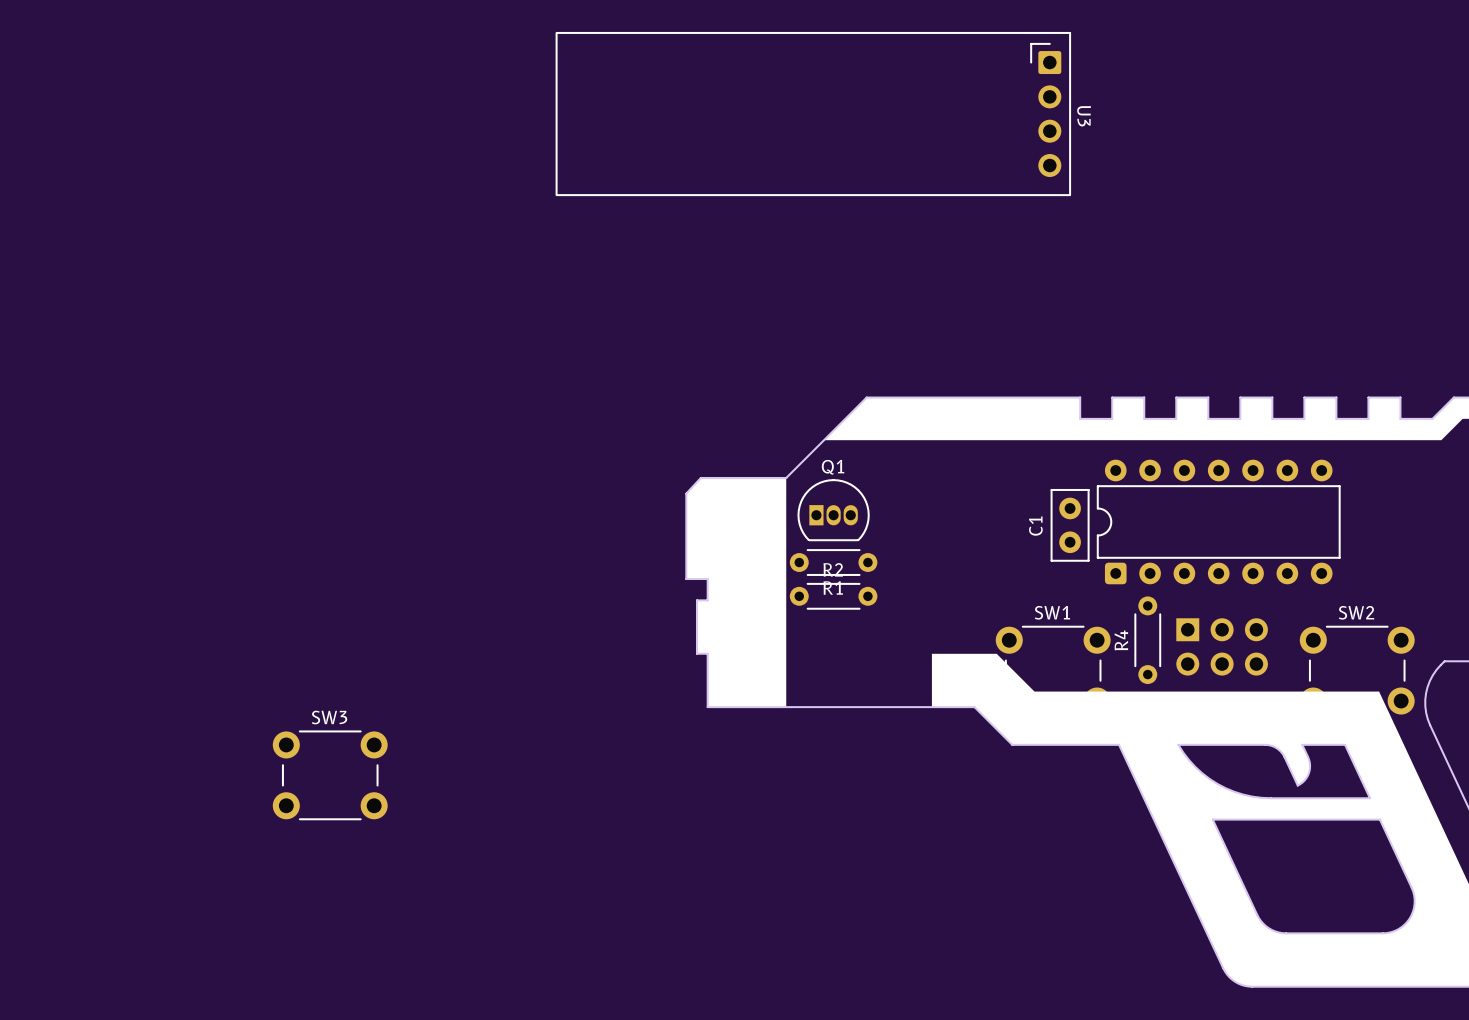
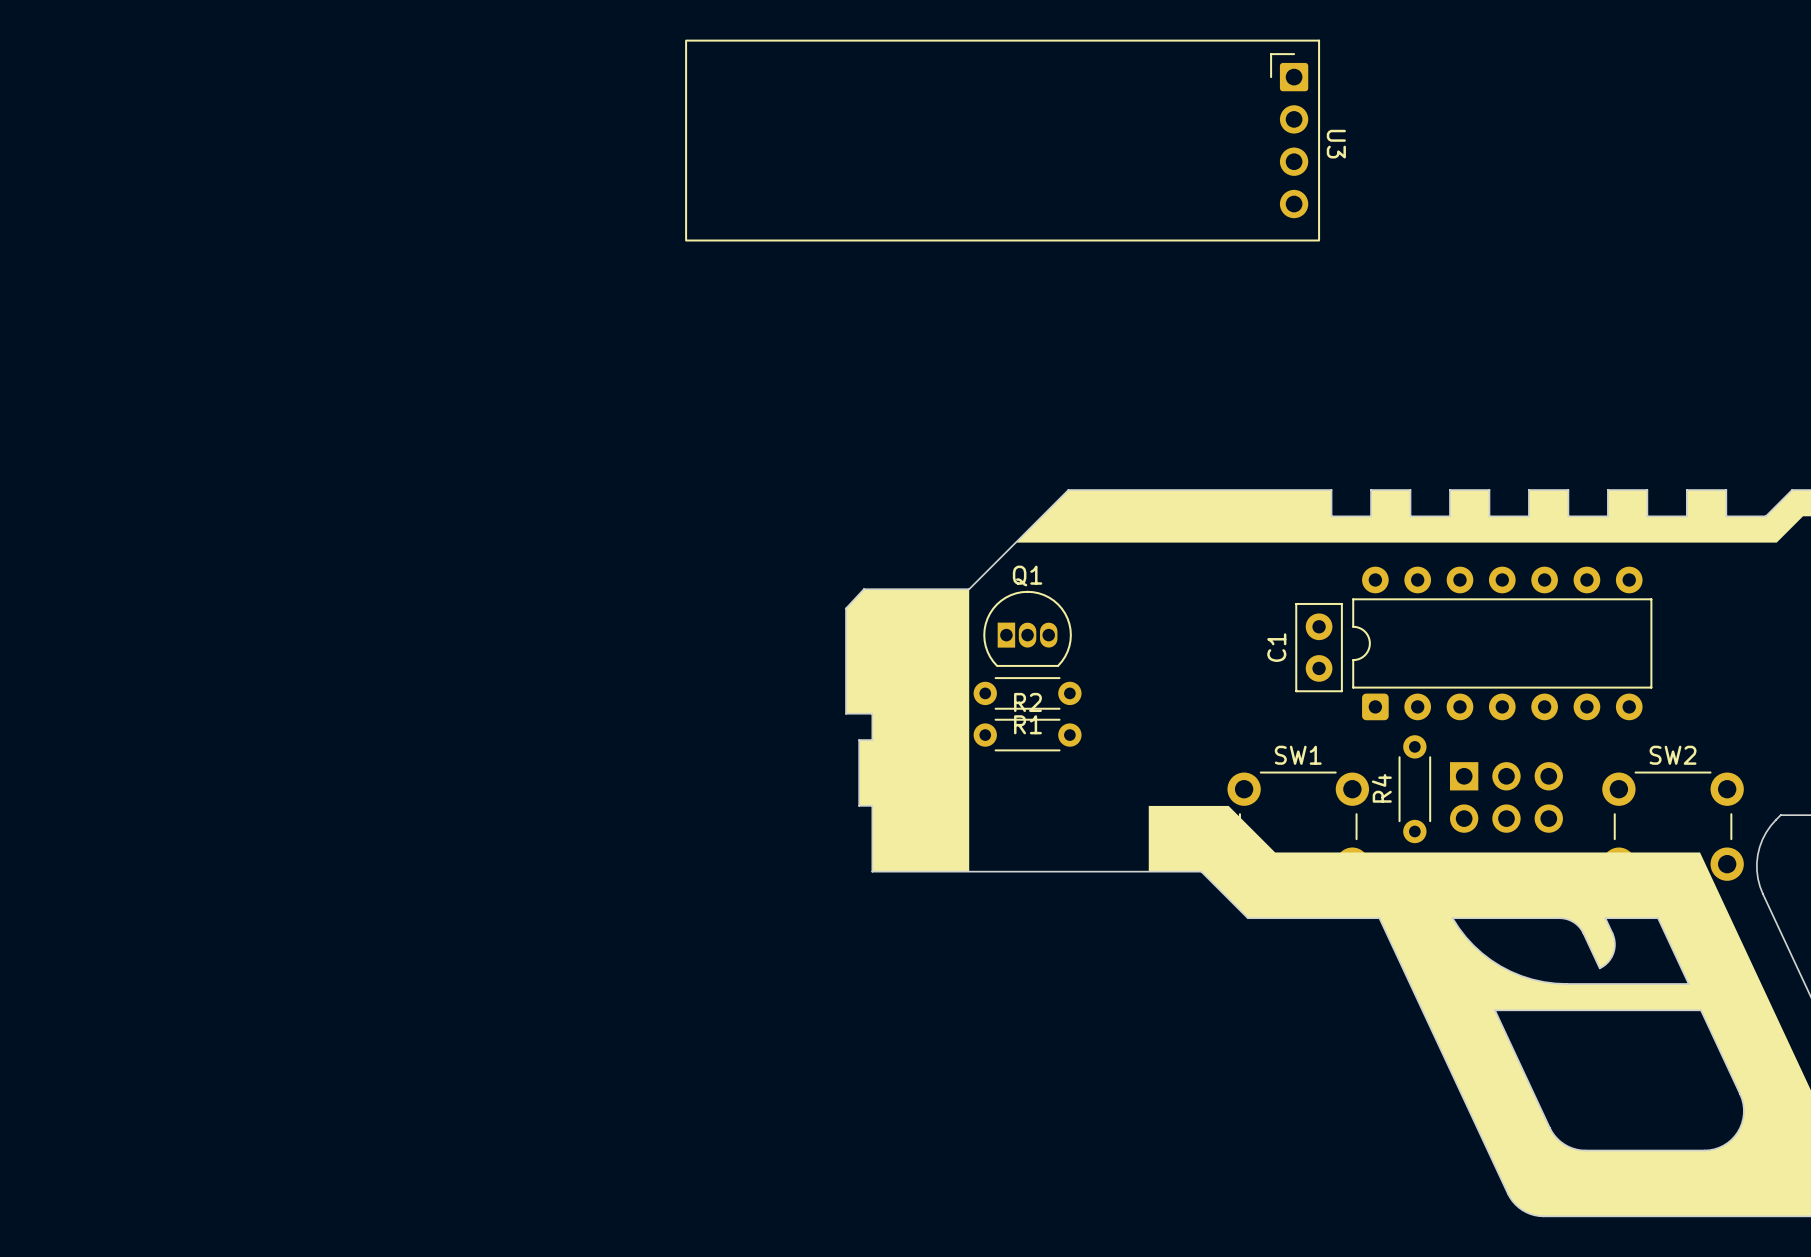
SW3: (330, 775) -> none

